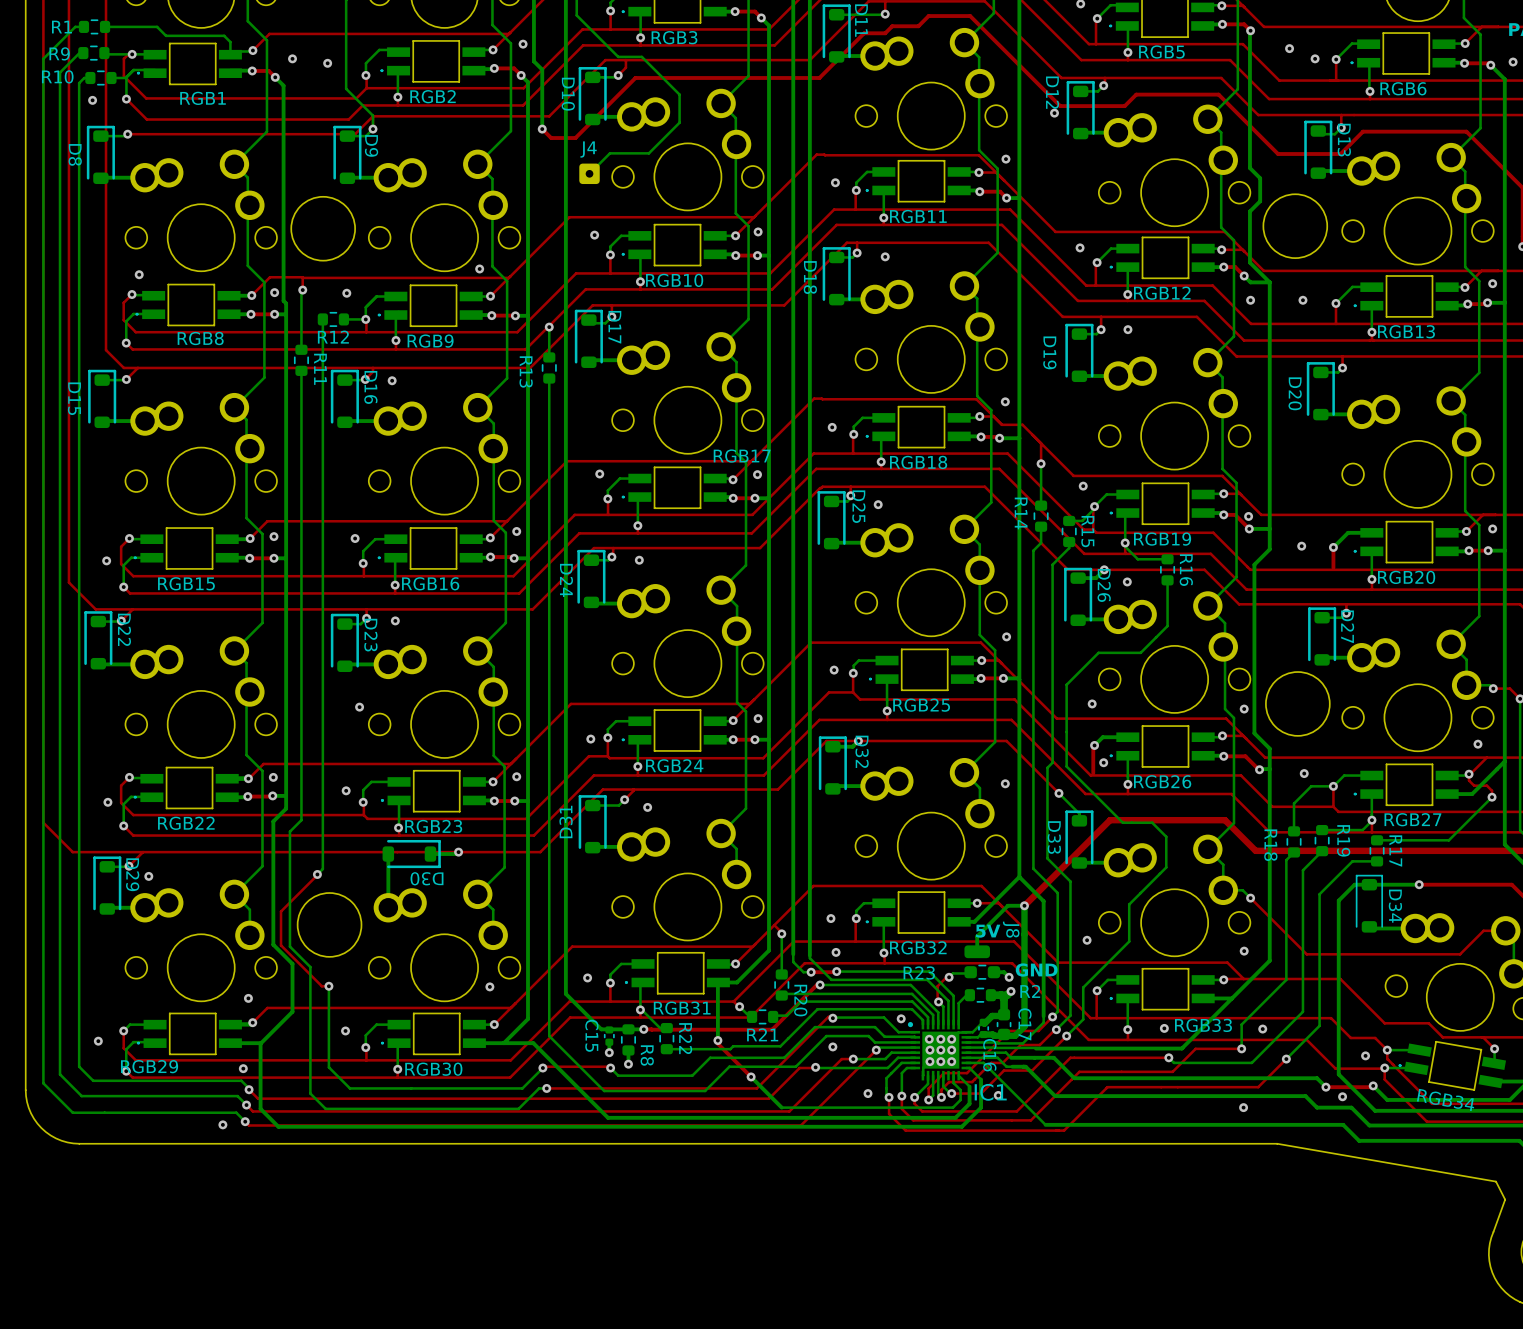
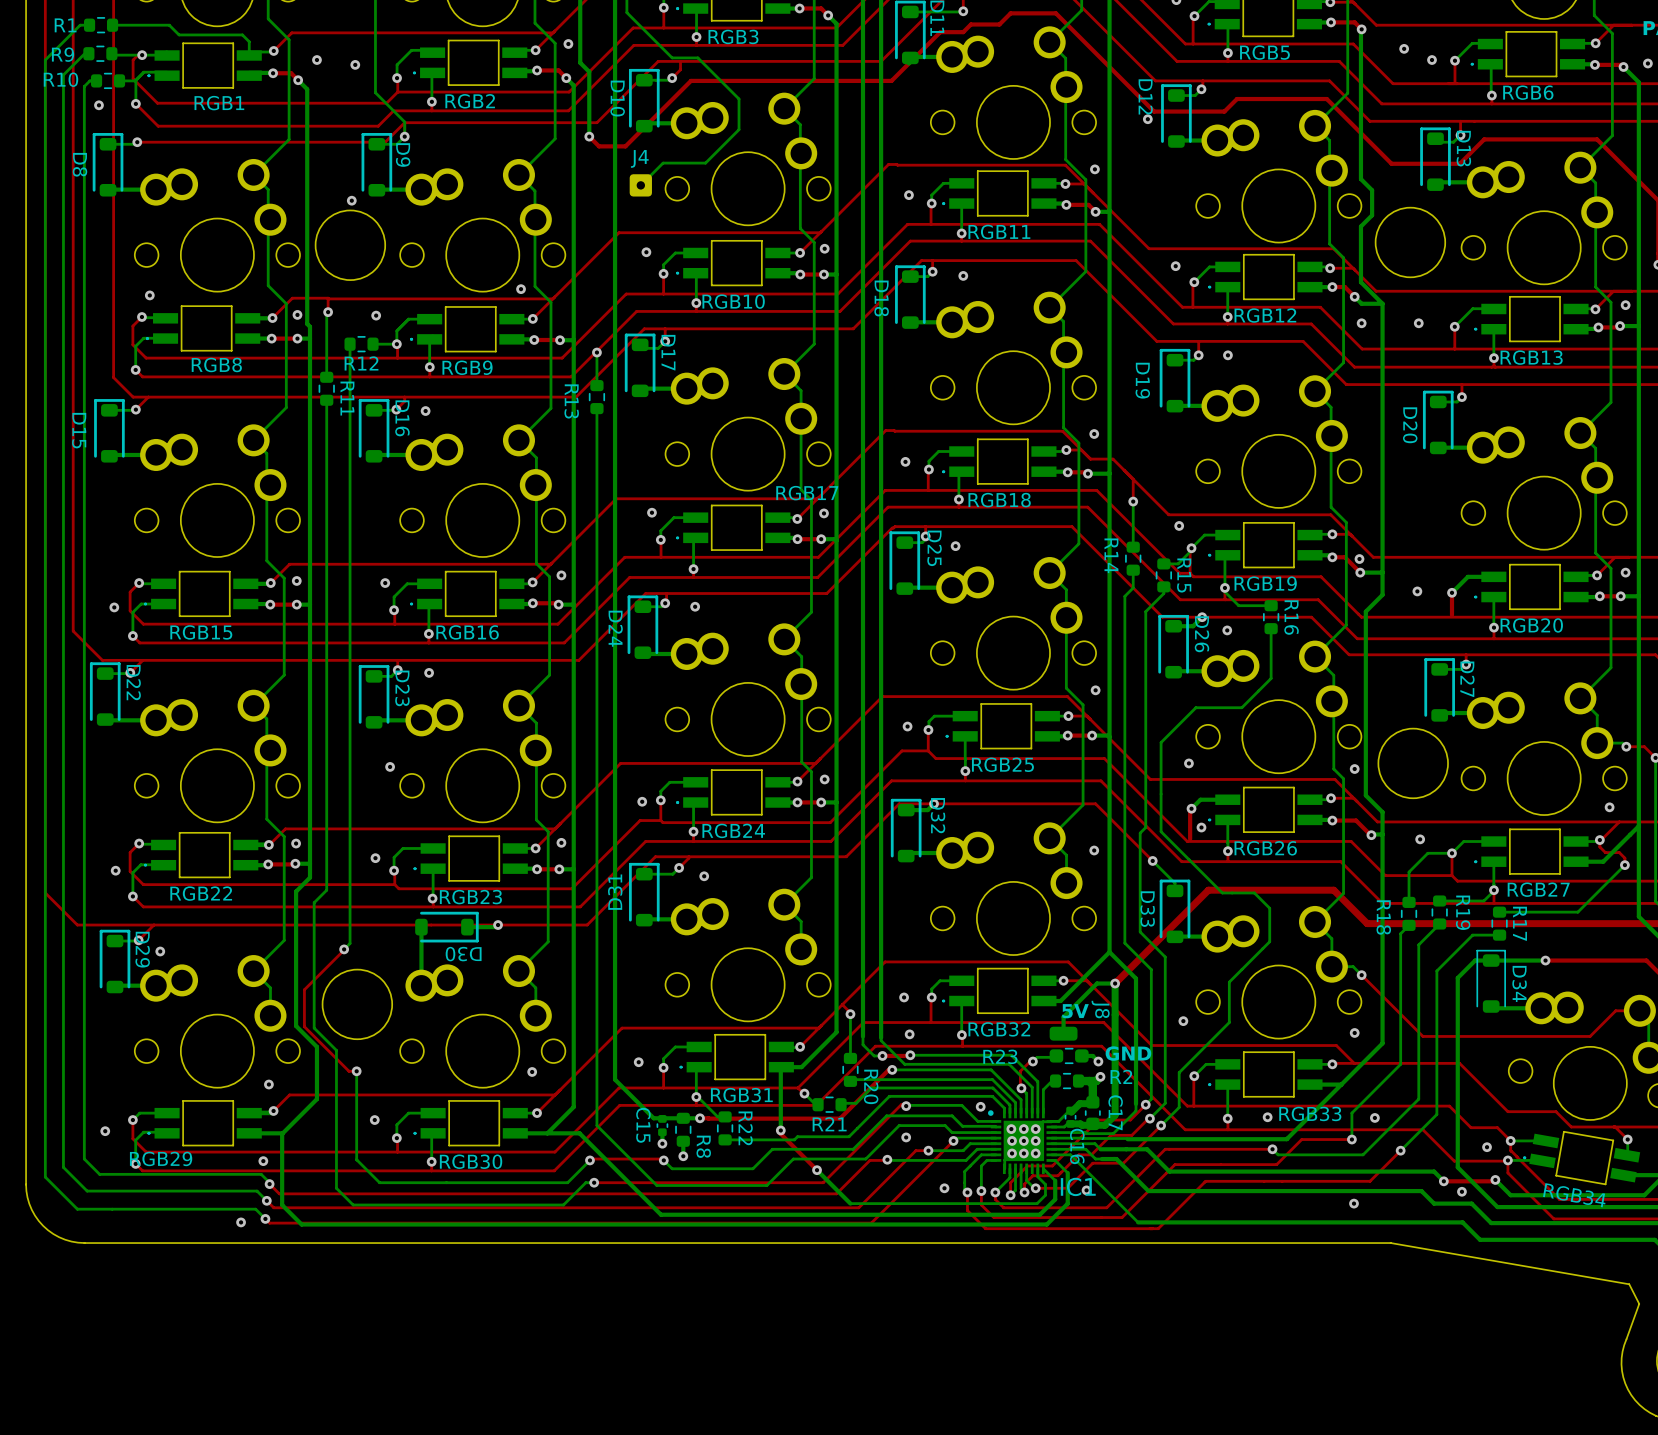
via: none -> (351, 200)

